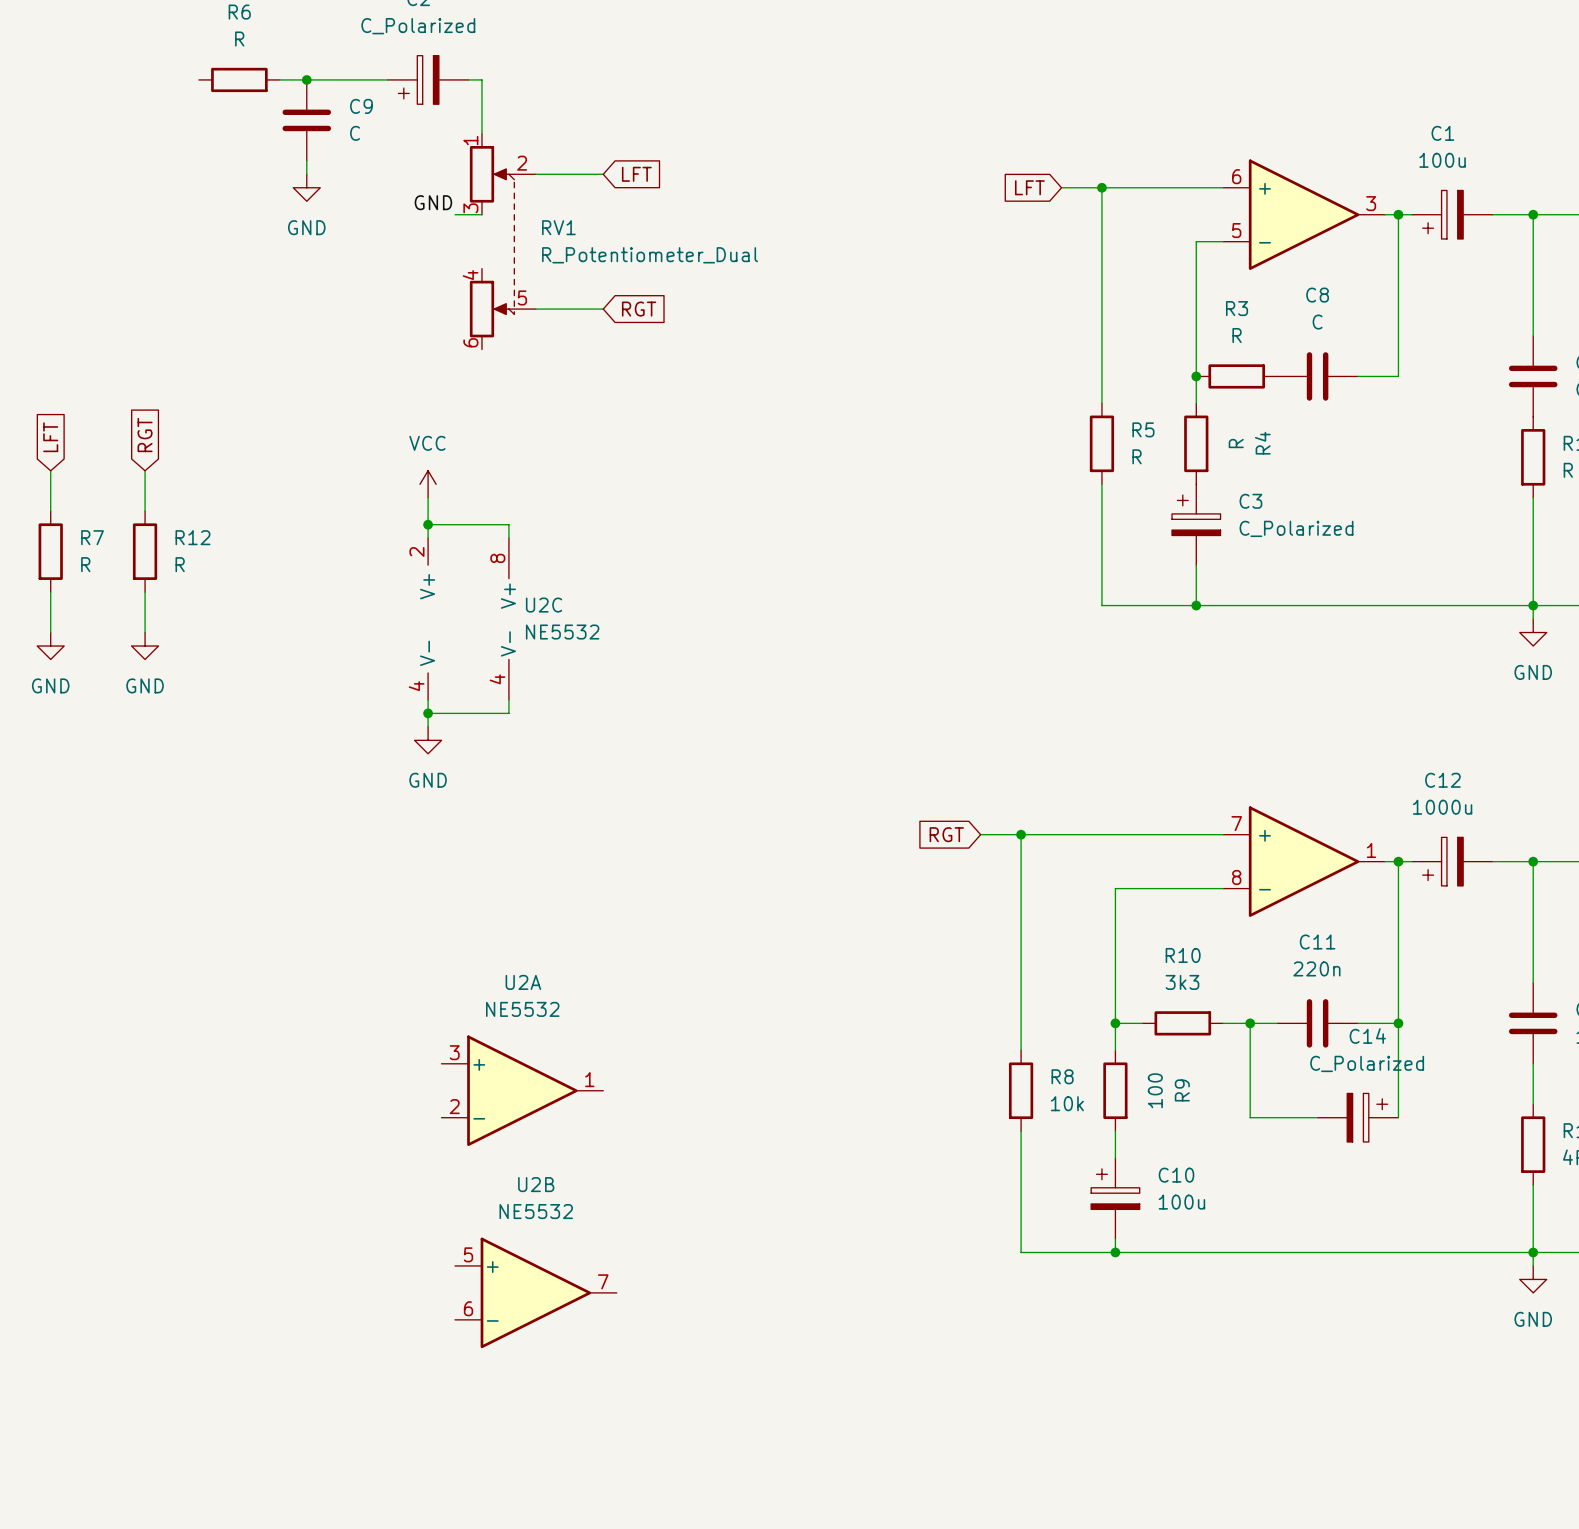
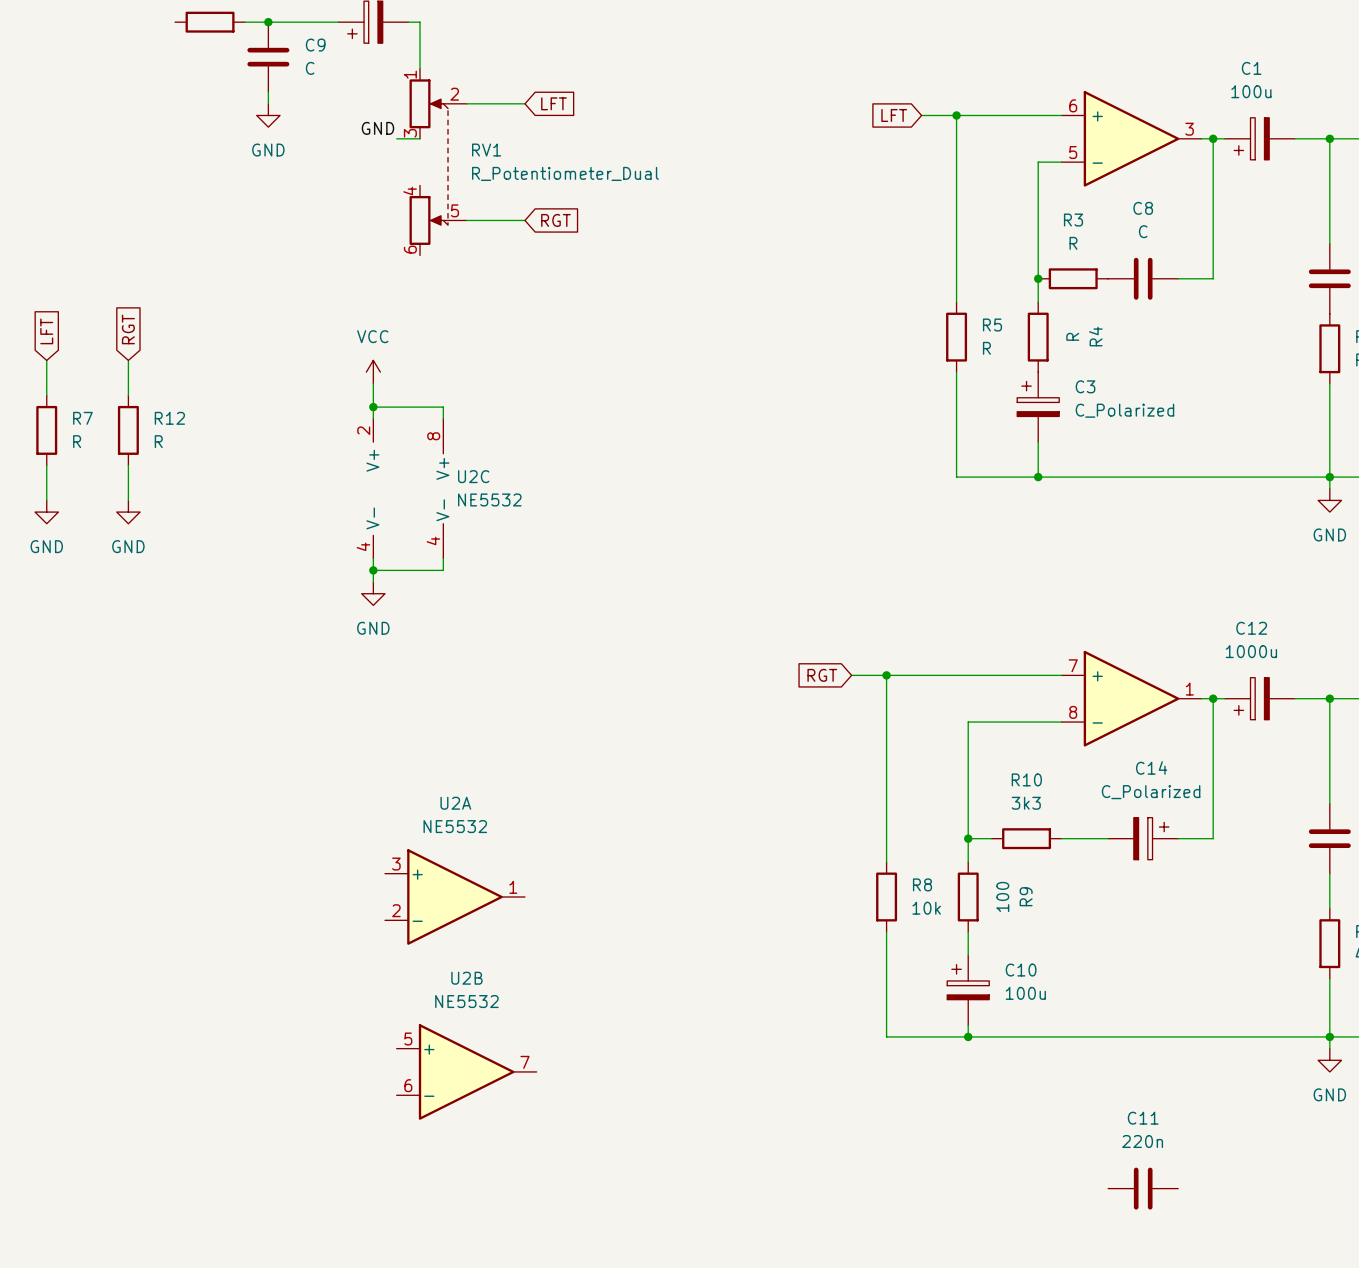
wire: (1250, 1023) (1250, 1117) (1317, 1117) -> none
junction: (1250, 1023) -> none
C11 position: (1317, 1023) -> (1143, 1188)
wire: (1398, 1023) (1398, 1117) -> none
junction: (1398, 1023) -> none
C14 position: (1358, 1117) -> (1143, 838)

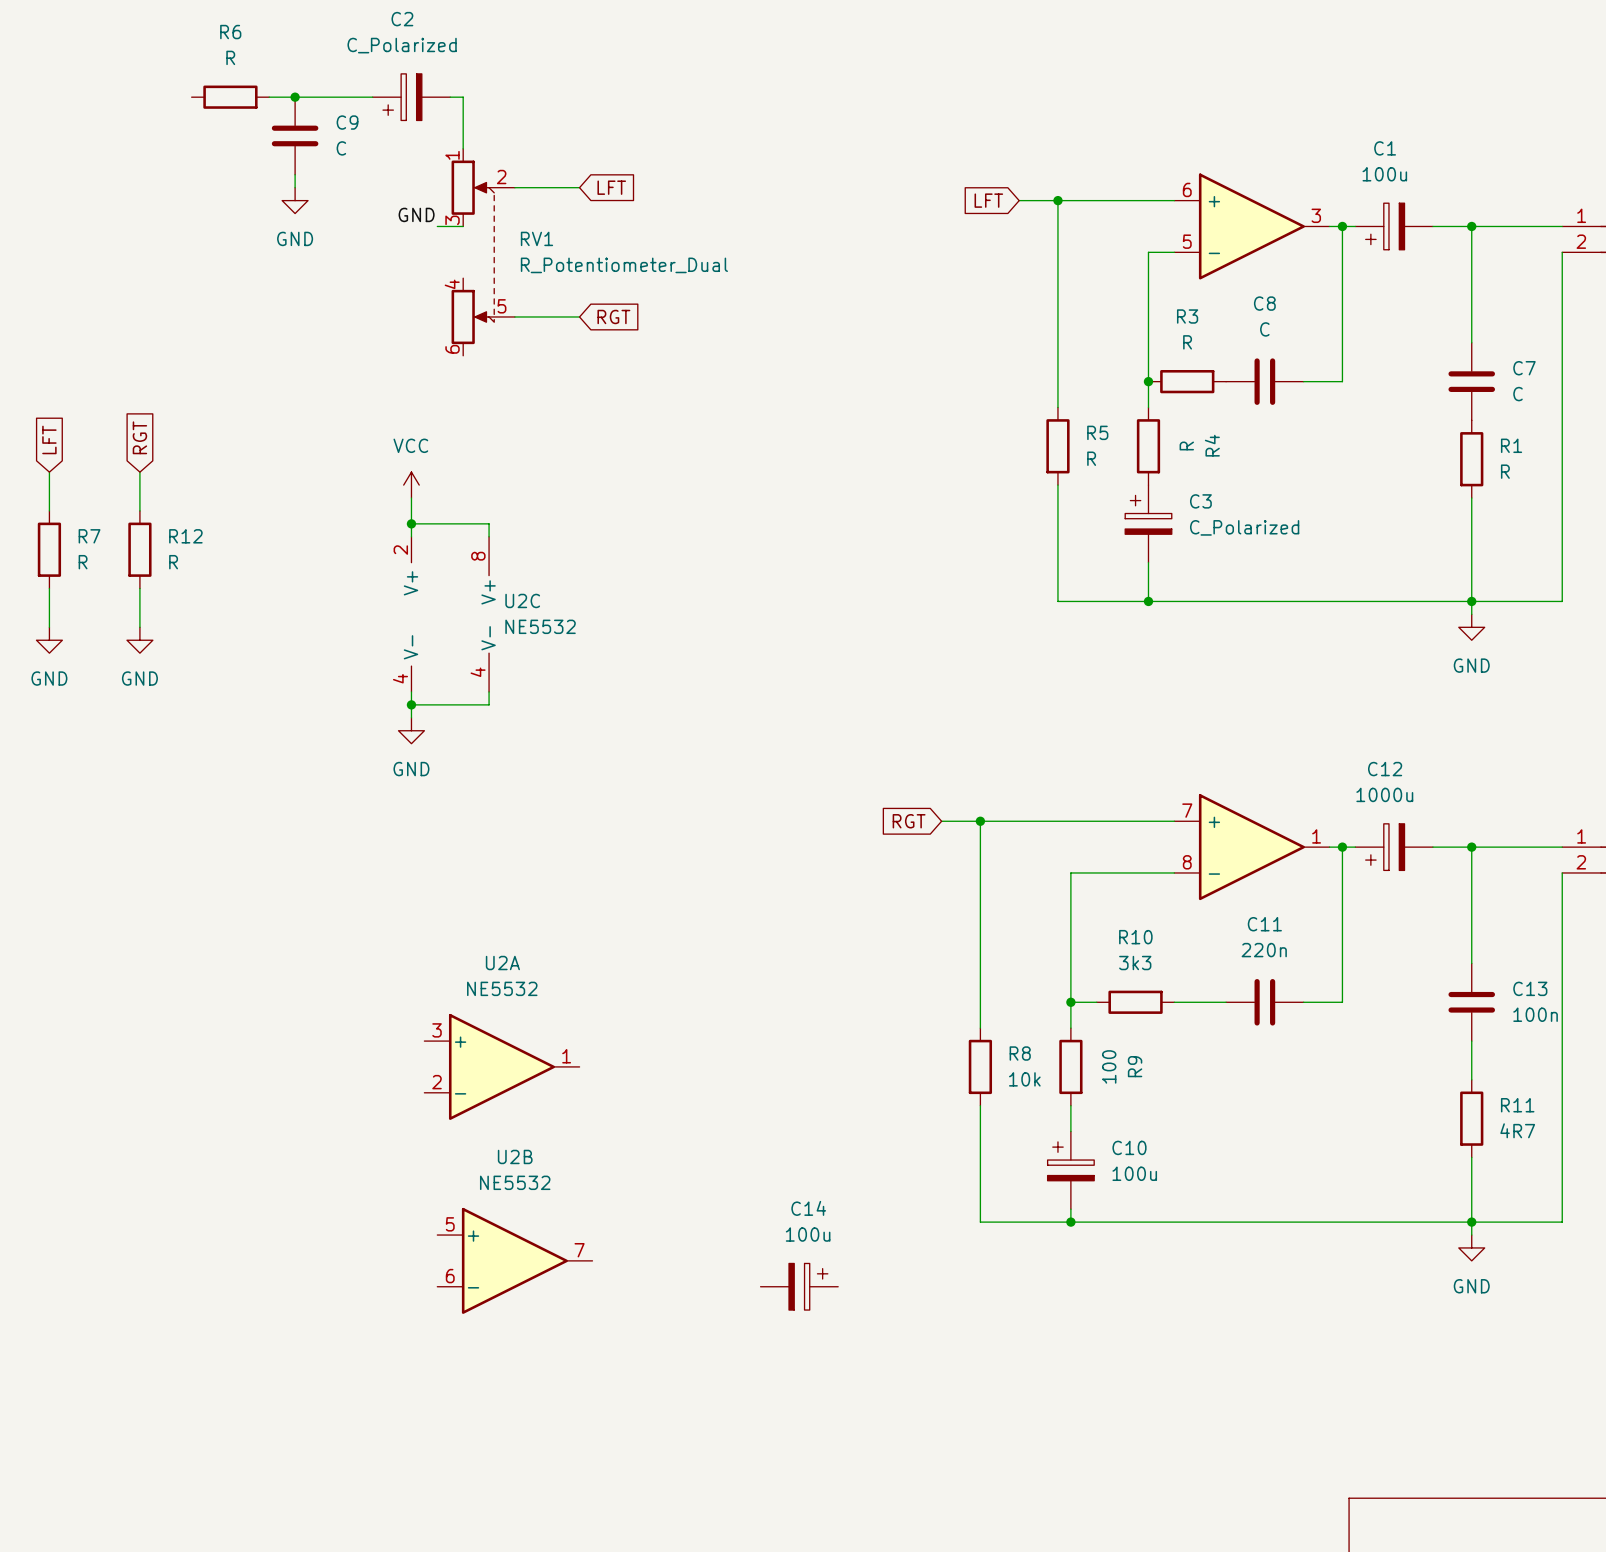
C14 value: C_Polarized (1151, 792) -> 100u (808, 1234)
C14 position: (1143, 838) -> (799, 1286)
C11 position: (1143, 1188) -> (1264, 1002)

